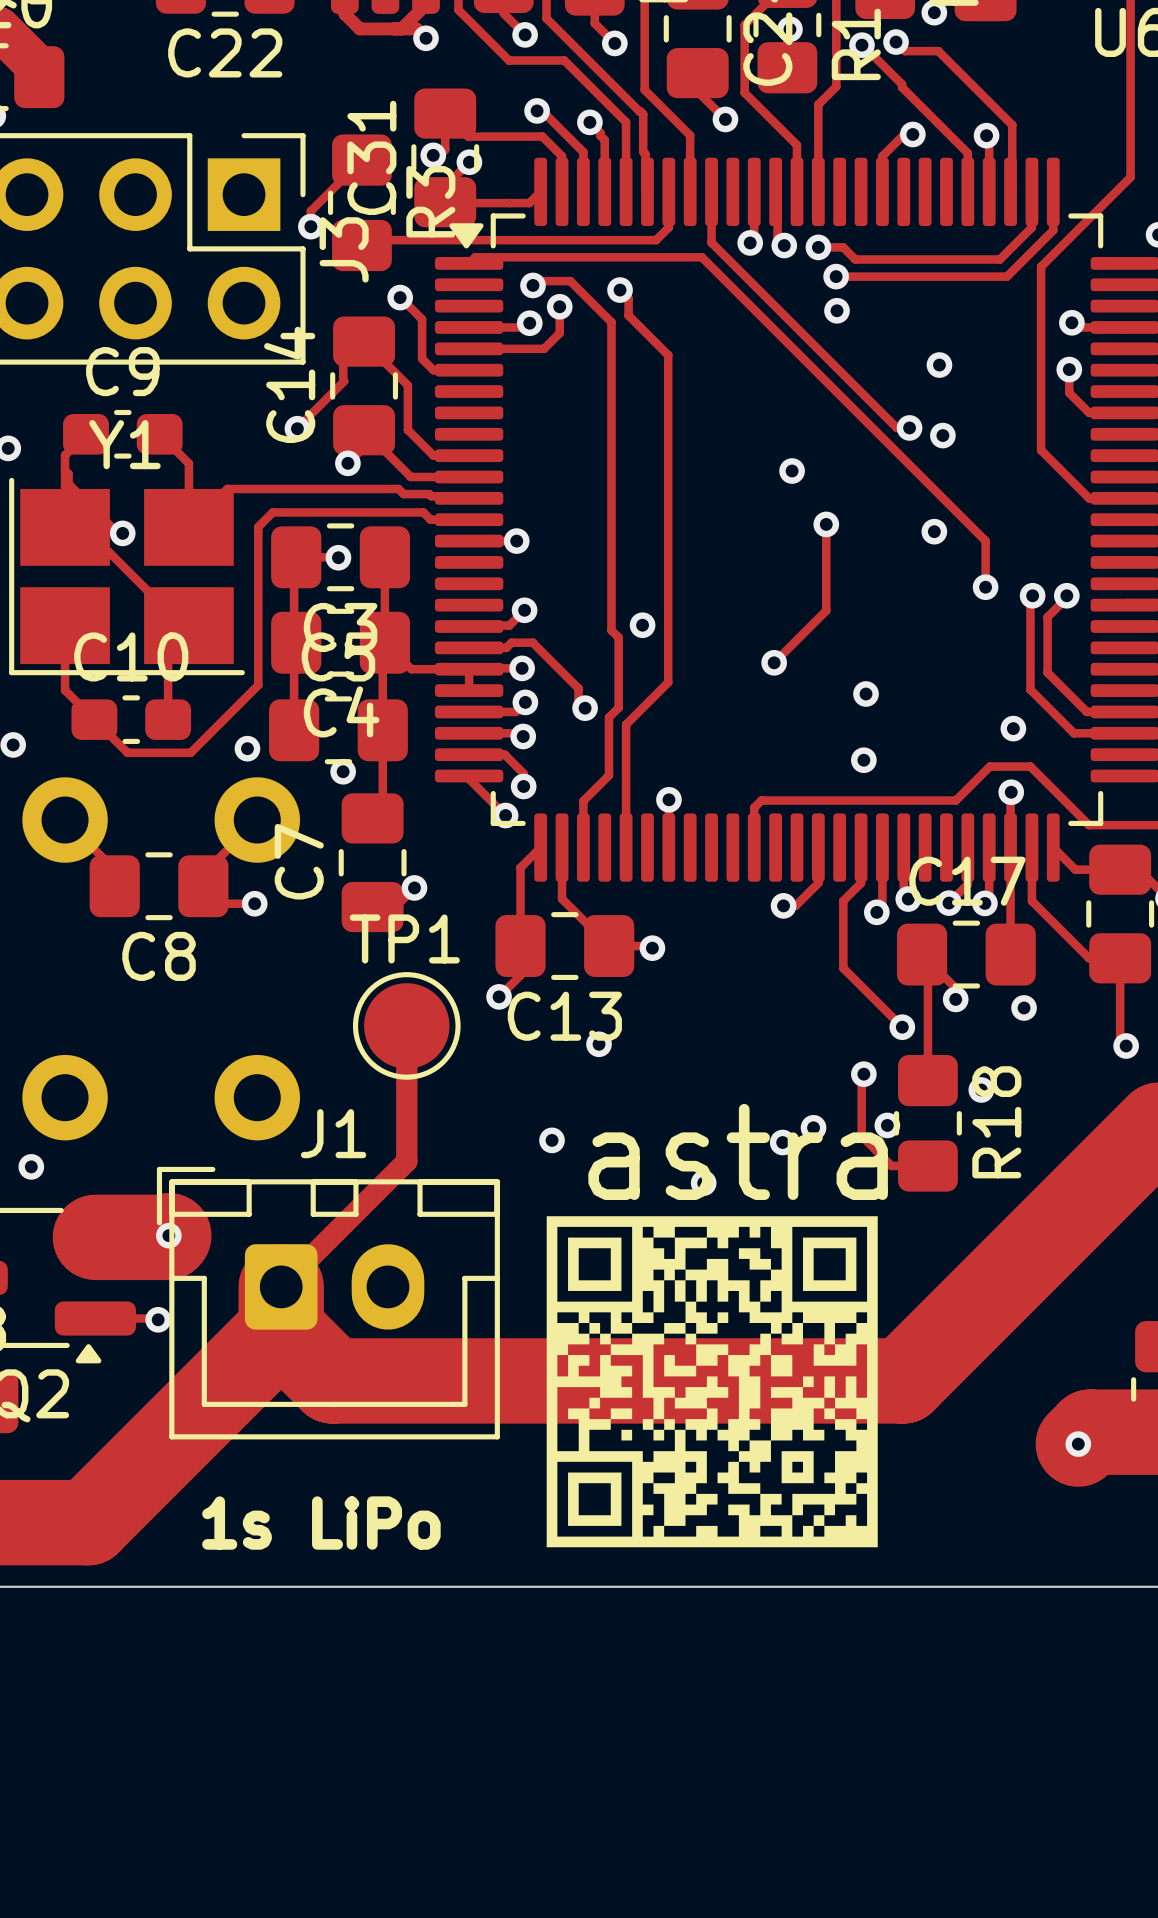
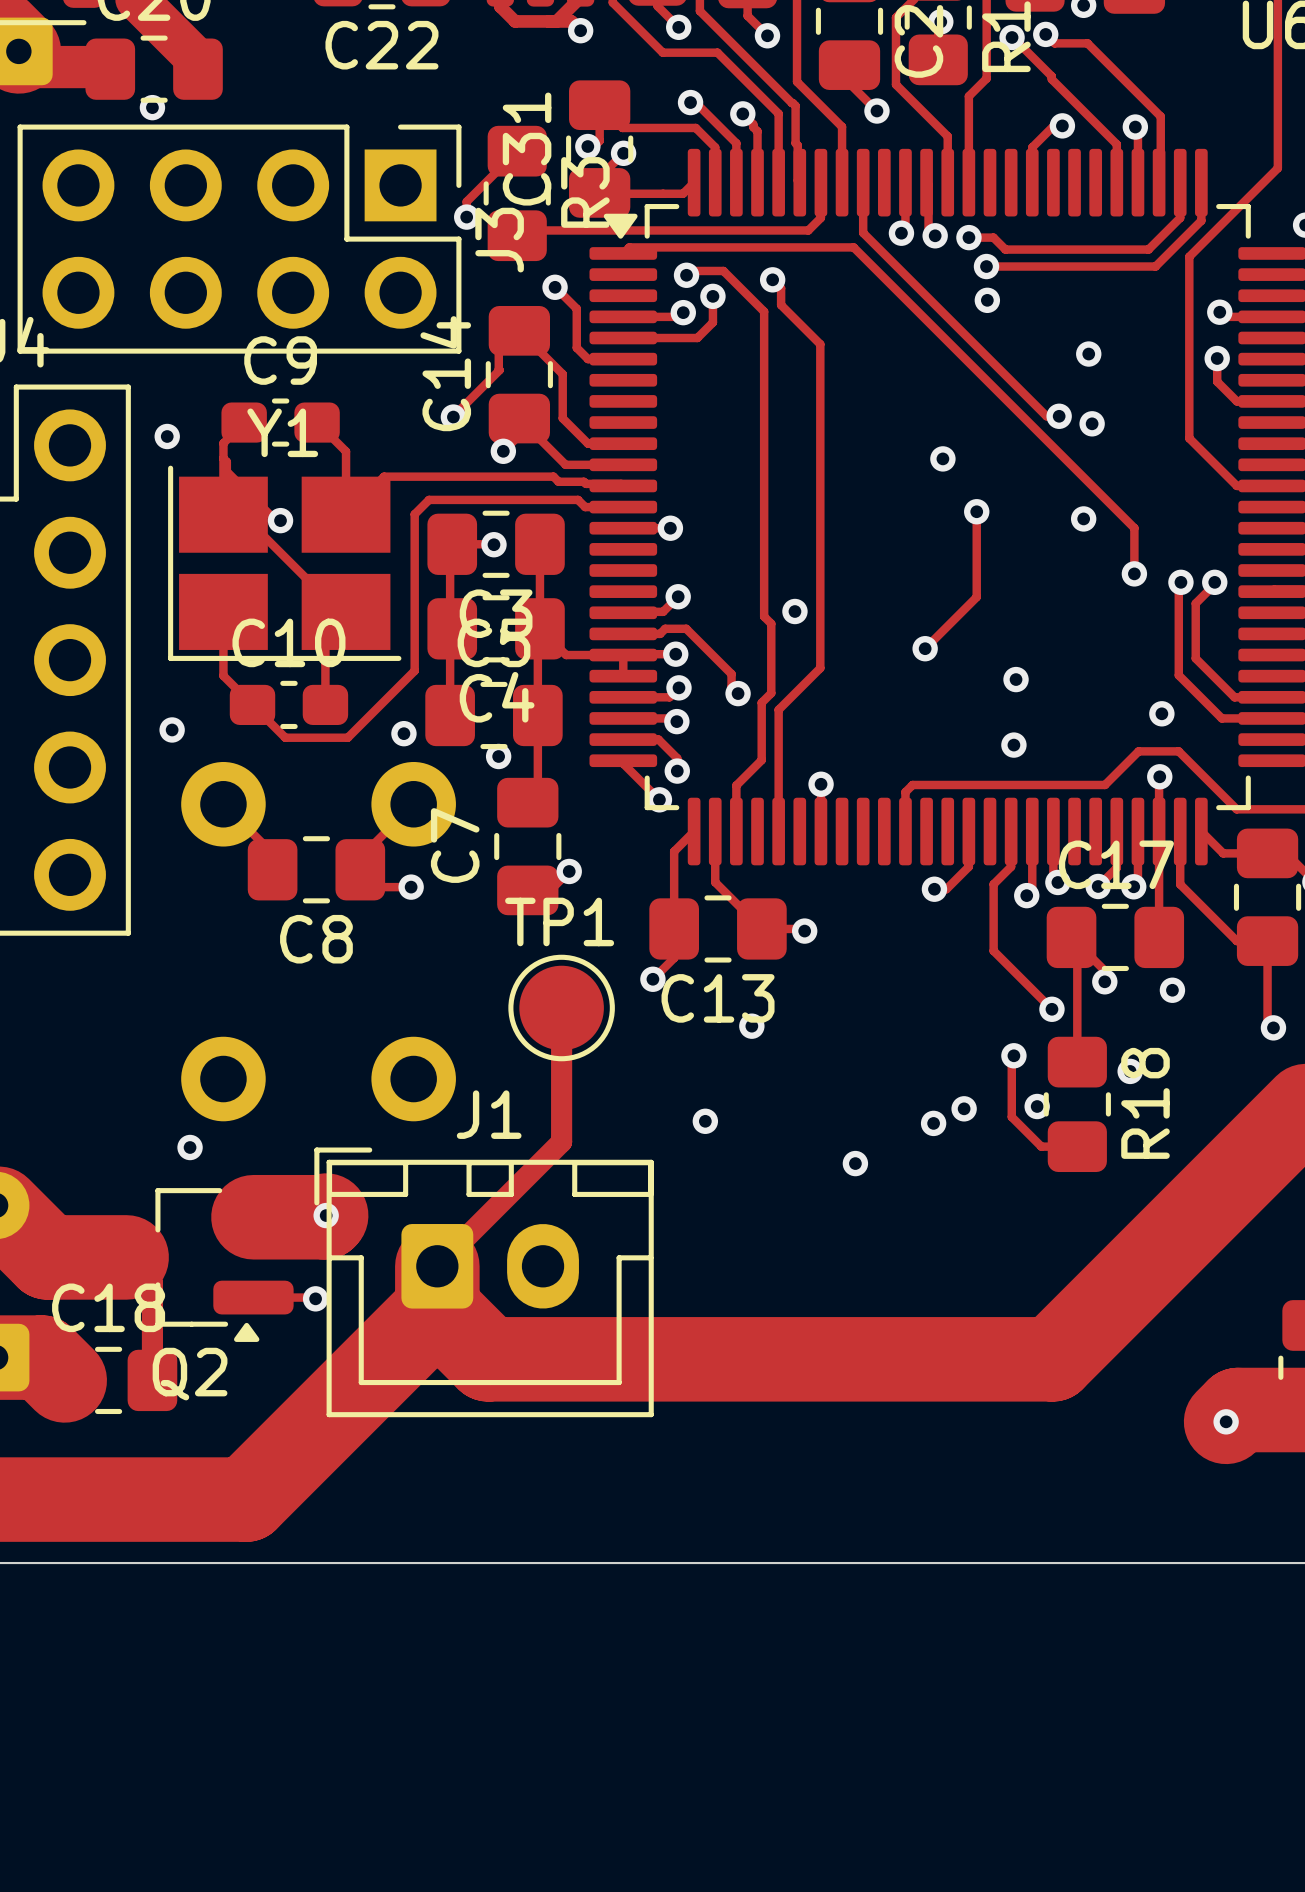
text: astra (738, 1151) -> none
drawing: [546, 1216, 878, 1548] -> none
text: 1s LiPo (321, 1523) -> none

